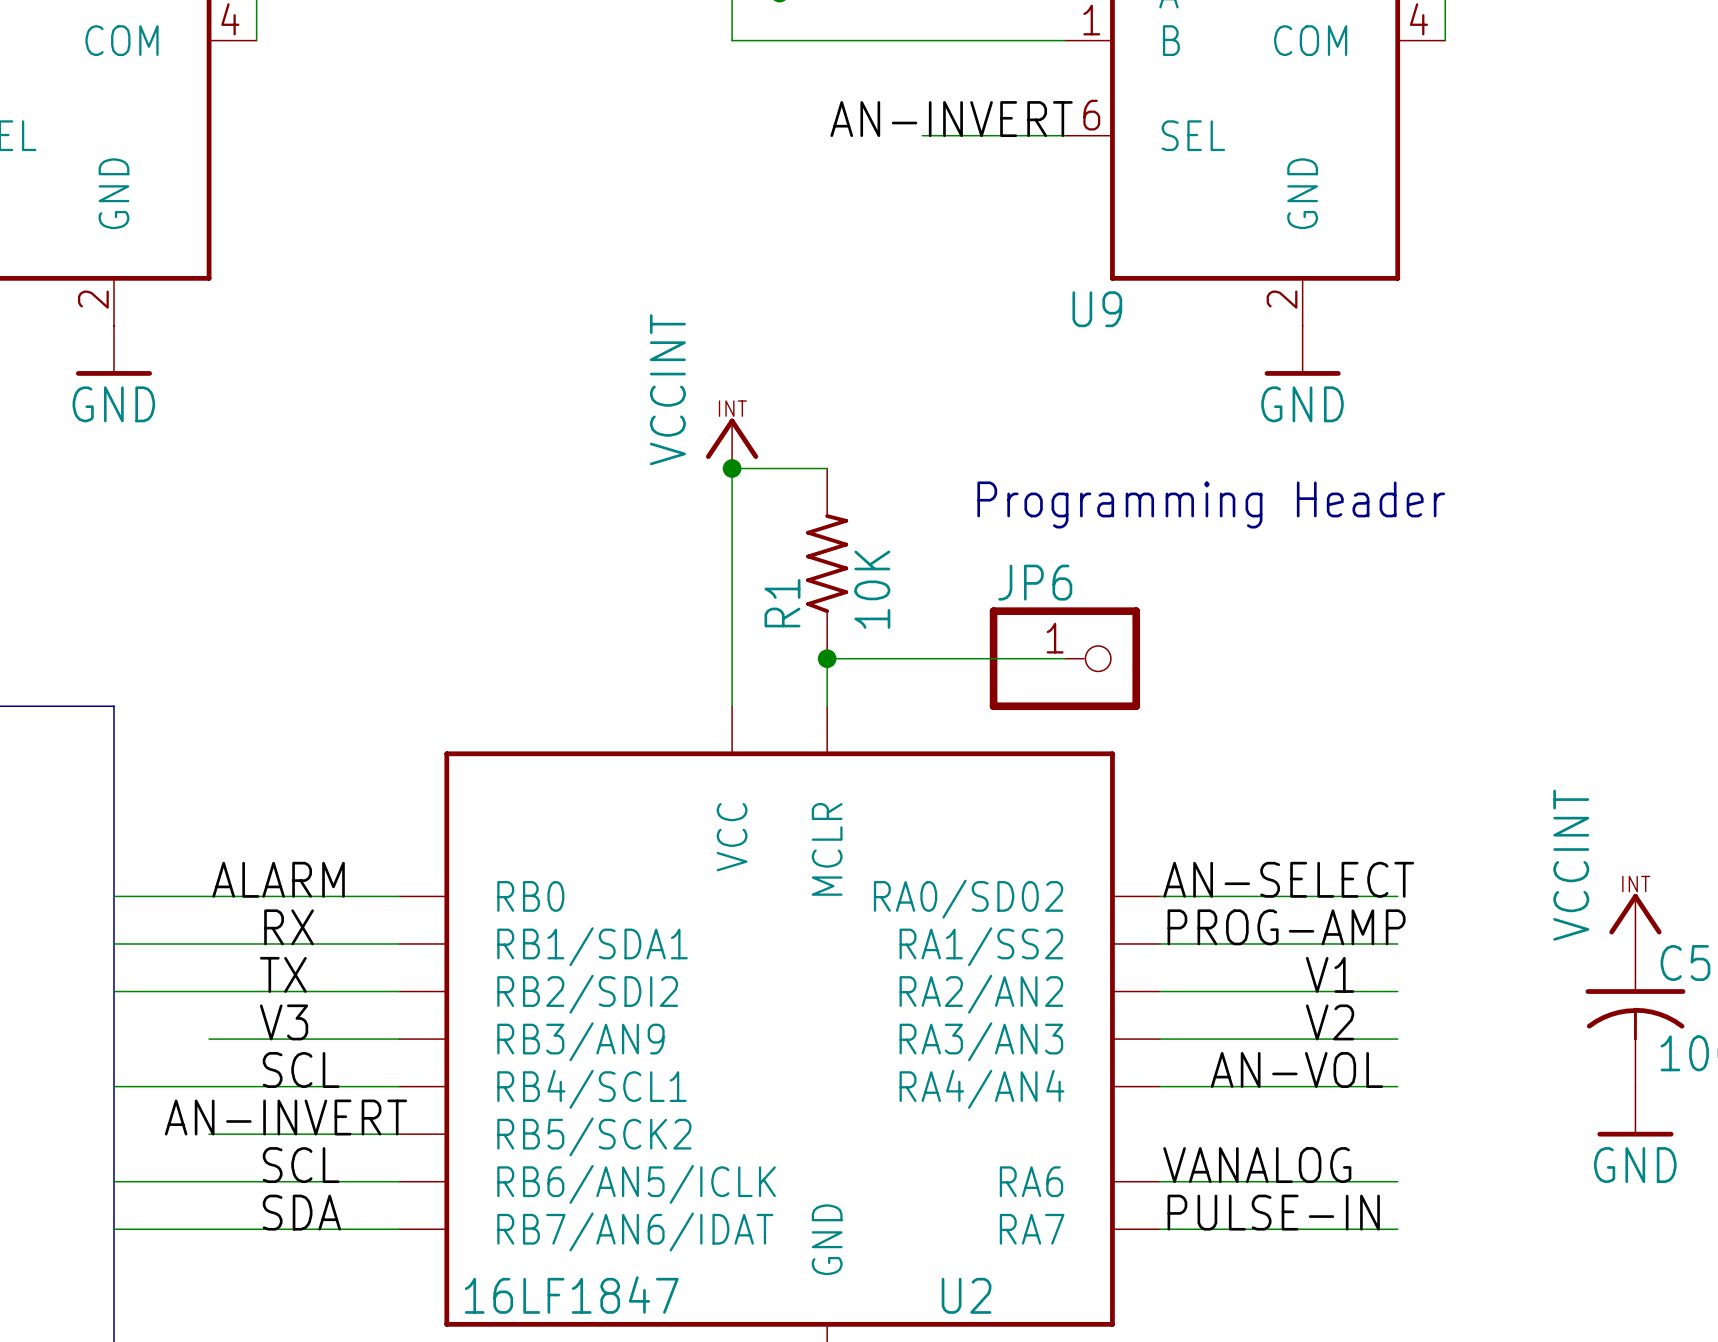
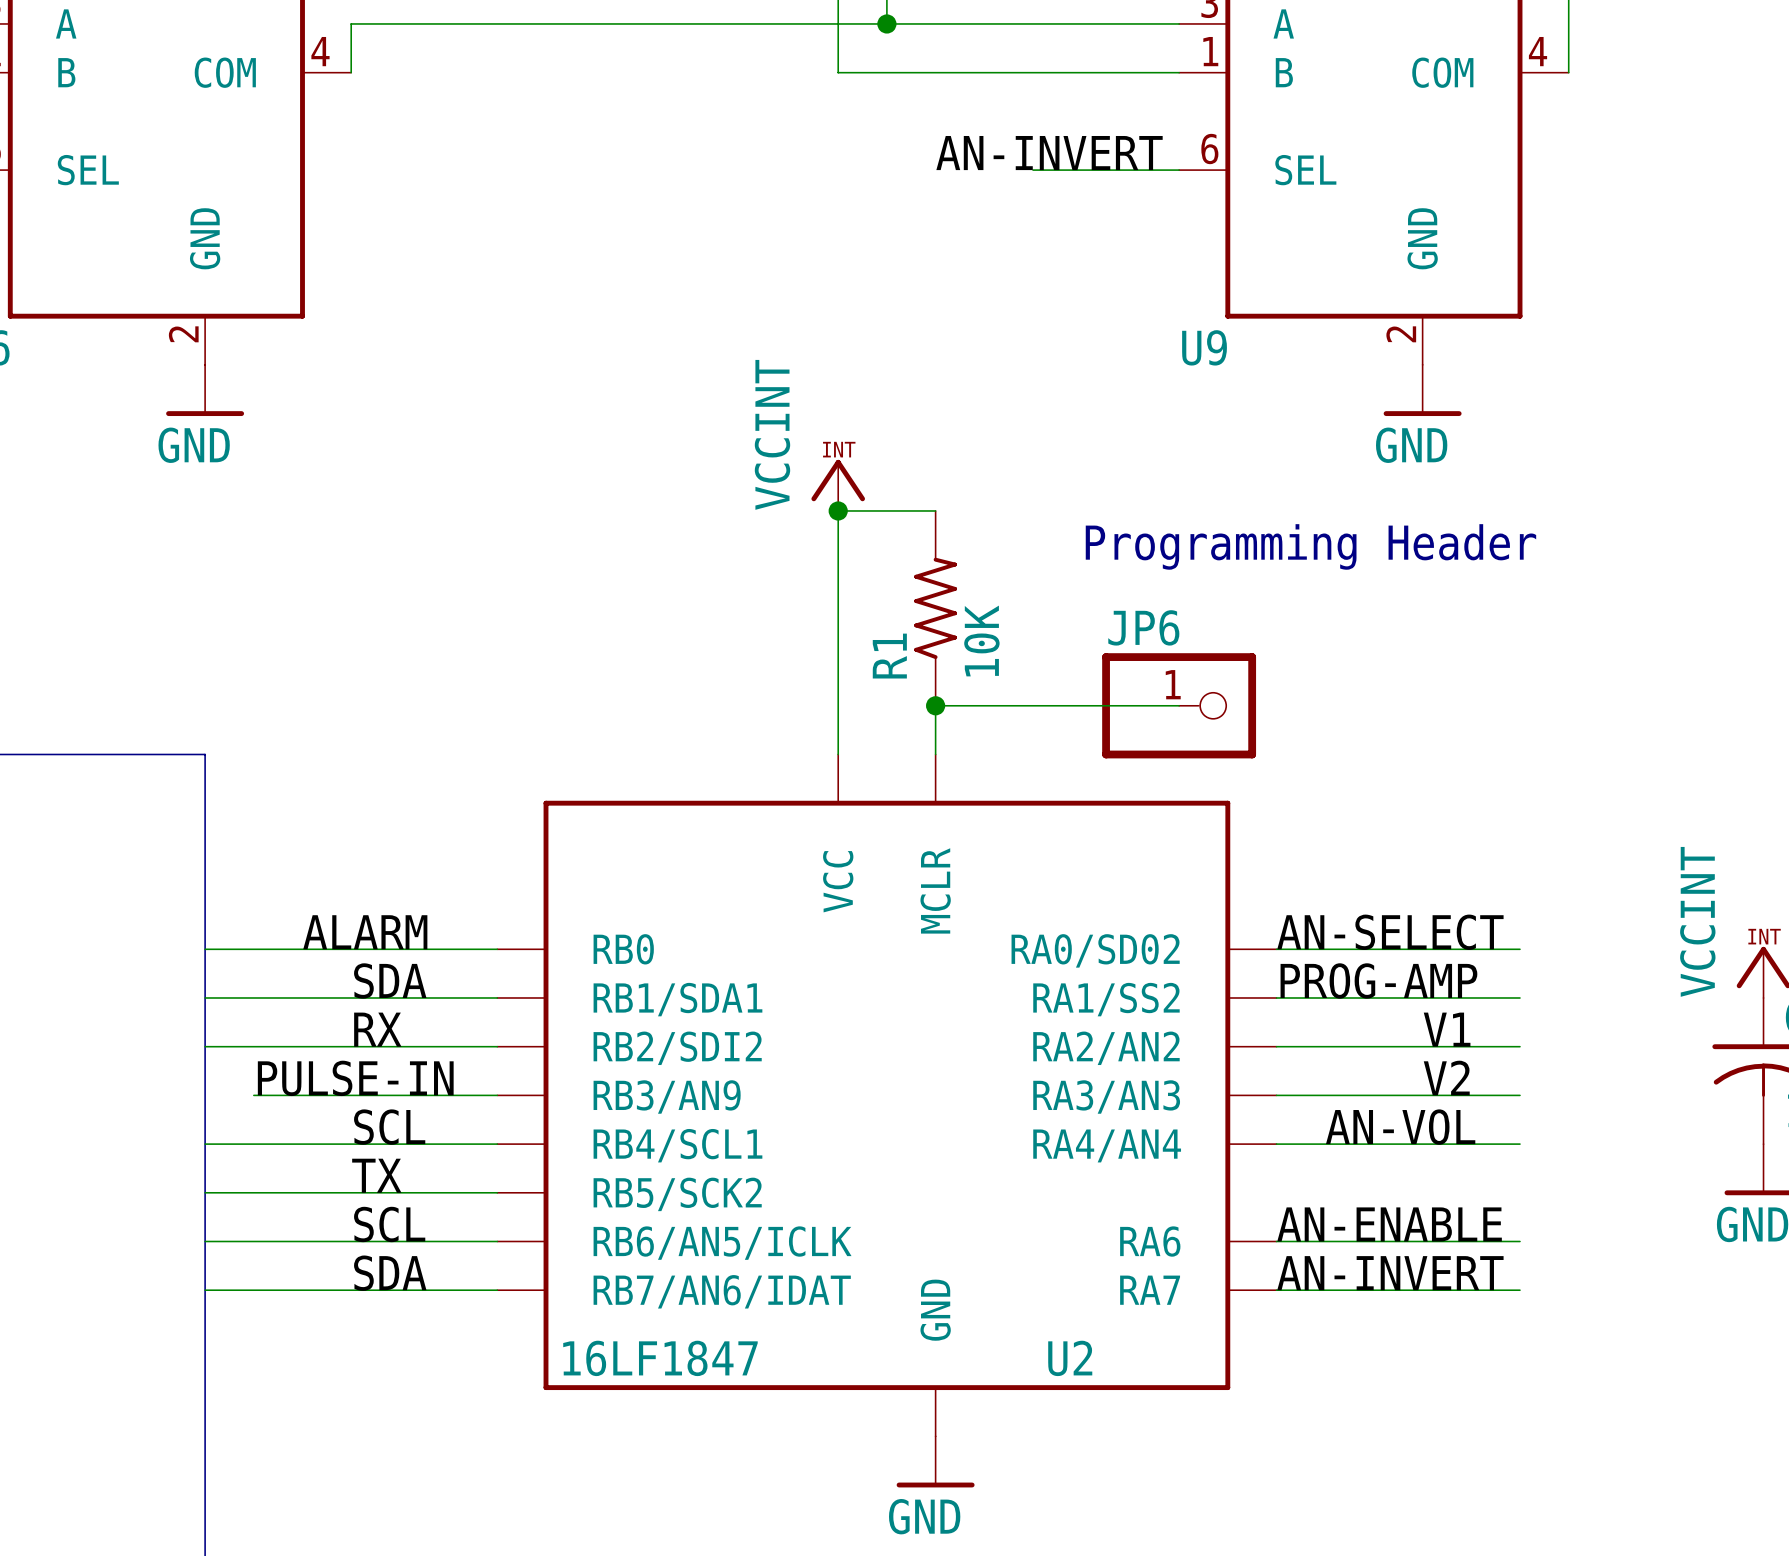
label: RX (289, 927) -> SDA (390, 980)
label: TX (283, 974) -> RX (377, 1029)
label: none -> PULSE-IN (355, 1078)
label: V3 (284, 1022) -> none
wire: none -> (253, 1095) (302, 1095)
label: none -> TX (376, 1175)
label: AN-INVERT (285, 1117) -> none
wire: none -> (205, 1192) (302, 1192)
label: VANALOG (1257, 1165) -> AN-ENABLE (1389, 1224)
label: PULSE-IN (1273, 1212) -> AN-INVERT (1390, 1273)

